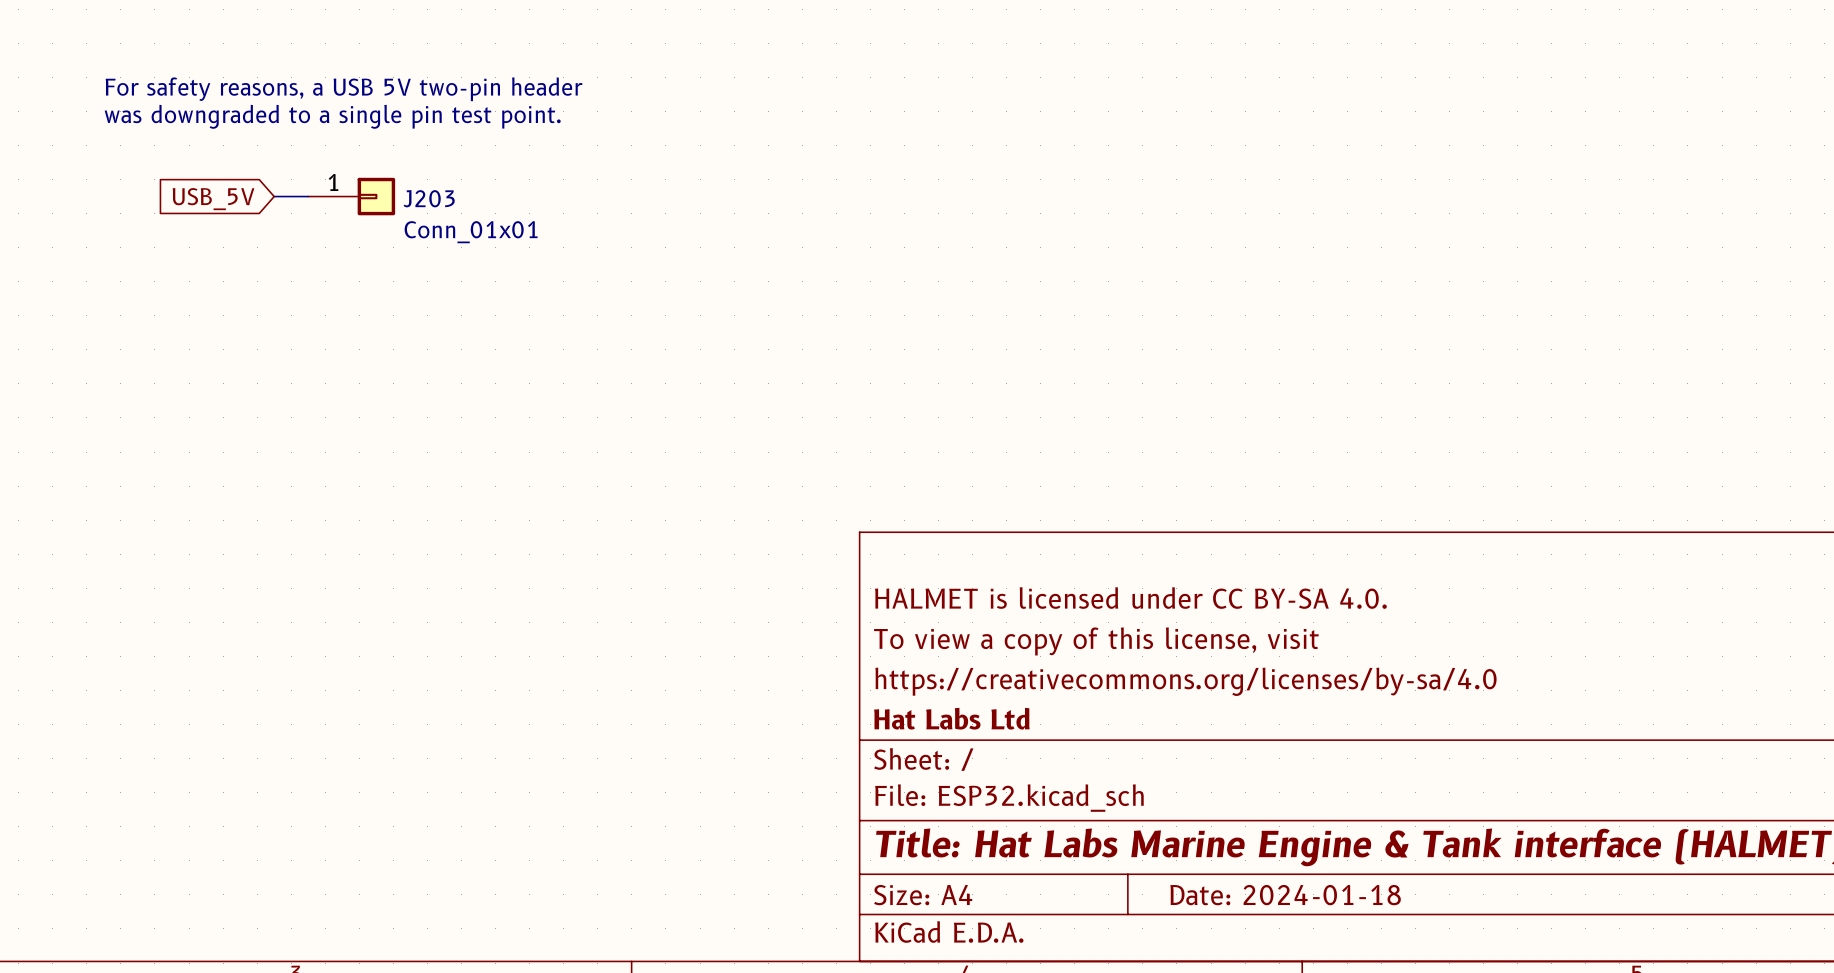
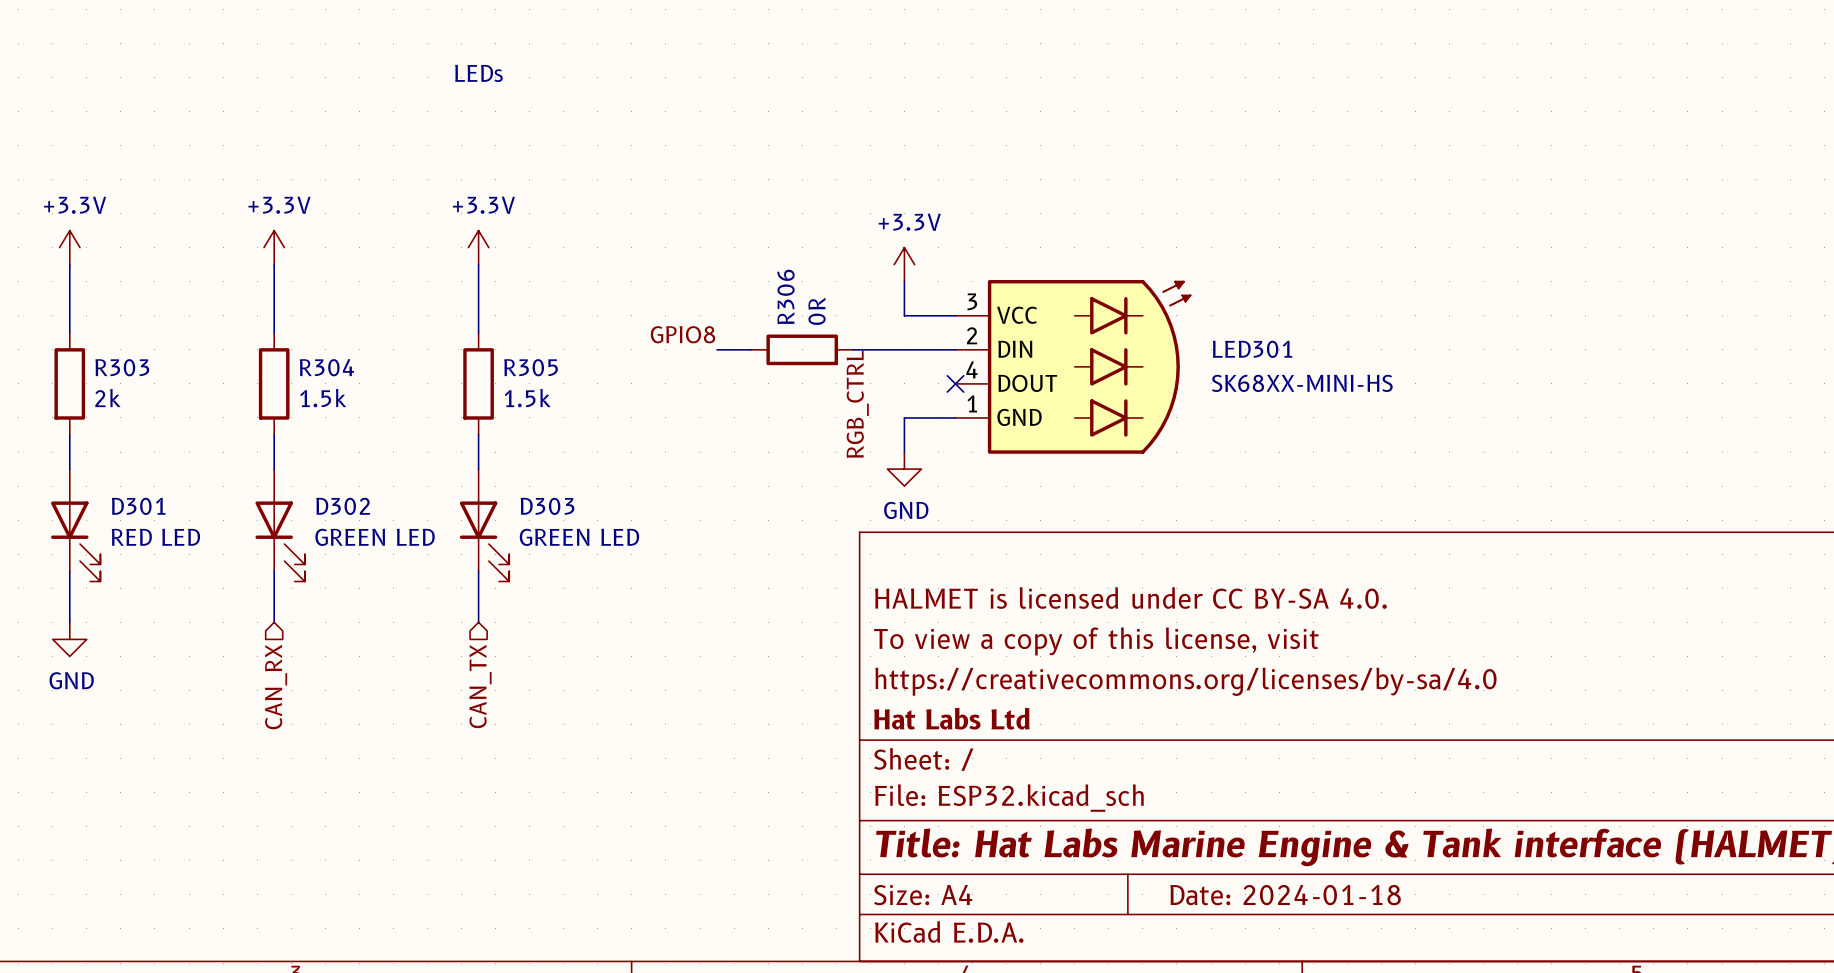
text: none -> LEDs (478, 73)
text: For safety reasons, a USB 5V two-pin header (344, 89) -> none
text: was downgraded to a single pin test point. (332, 116) -> none
wire: (274, 196) (308, 196) -> none
J203: Conn_01x01 (351, 196) -> none
global label: USB_5V (213, 199) -> none
power symbol: none -> +3.3V (69, 247)
power symbol: none -> +3.3V (274, 247)
power symbol: none -> +3.3V (478, 247)
wire: none -> (69, 264) (69, 332)
wire: none -> (274, 264) (274, 332)
wire: none -> (478, 264) (478, 332)
power symbol: none -> +3.3V (904, 264)
wire: none -> (904, 281) (904, 315) (955, 315)
label: none -> GPIO8 (682, 334)
wire: none -> (717, 349) (751, 349)
R306: none -> 0R (802, 349)
wire: none -> (853, 349) (955, 349)
LED301: none -> SK68XX-MINI-HS (1073, 366)
R303: none -> 2k (69, 383)
R304: none -> 1.5k (274, 383)
R305: none -> 1.5k (478, 383)
no-connect mark: none -> (955, 383)
label: none -> RGB_CTRL (857, 404)
wire: none -> (955, 417) (904, 417) (904, 452)
wire: none -> (69, 435) (69, 469)
wire: none -> (274, 435) (274, 469)
wire: none -> (478, 435) (478, 469)
power symbol: none -> GND (904, 469)
D301: none -> RED LED (75, 525)
D302: none -> GREEN LED (280, 525)
D303: none -> GREEN LED (484, 525)
wire: none -> (69, 571) (69, 622)
wire: none -> (274, 571) (274, 622)
wire: none -> (478, 571) (478, 622)
power symbol: none -> GND (69, 639)
hierarchical label: none -> CAN_TX (480, 686)
hierarchical label: none -> CAN_RX (276, 687)

